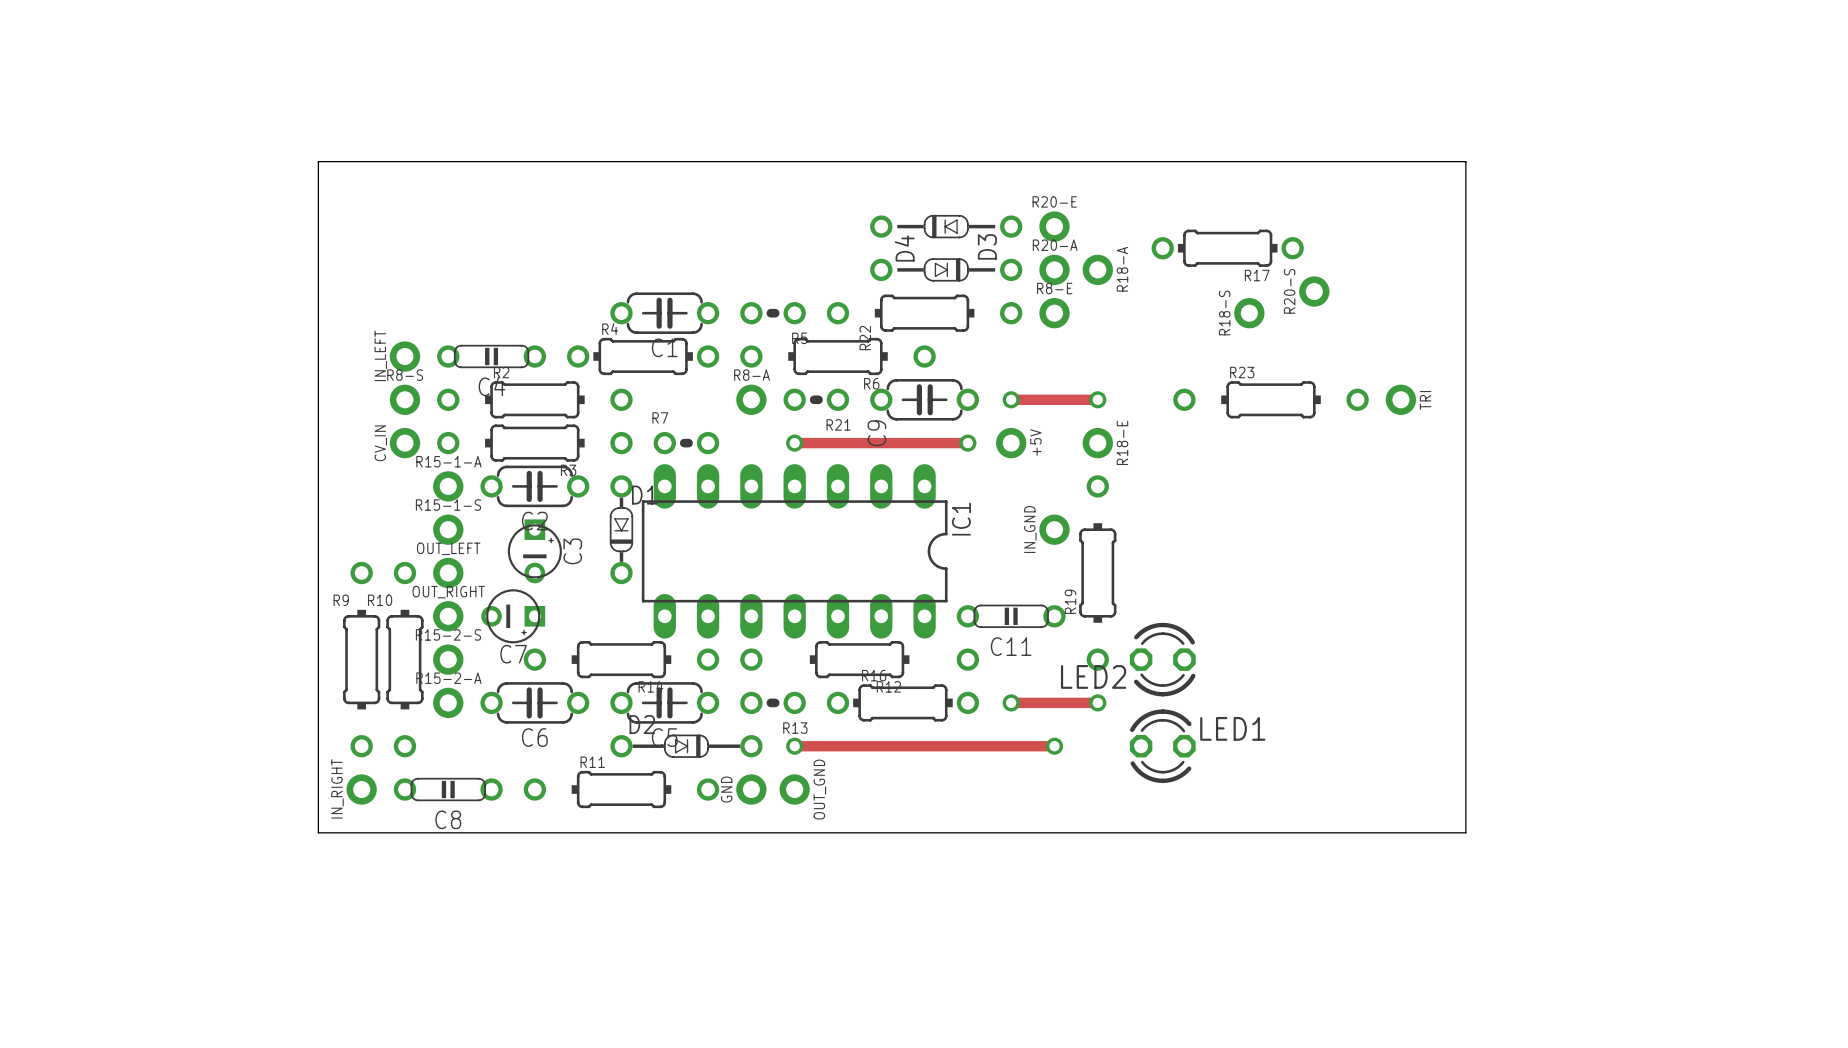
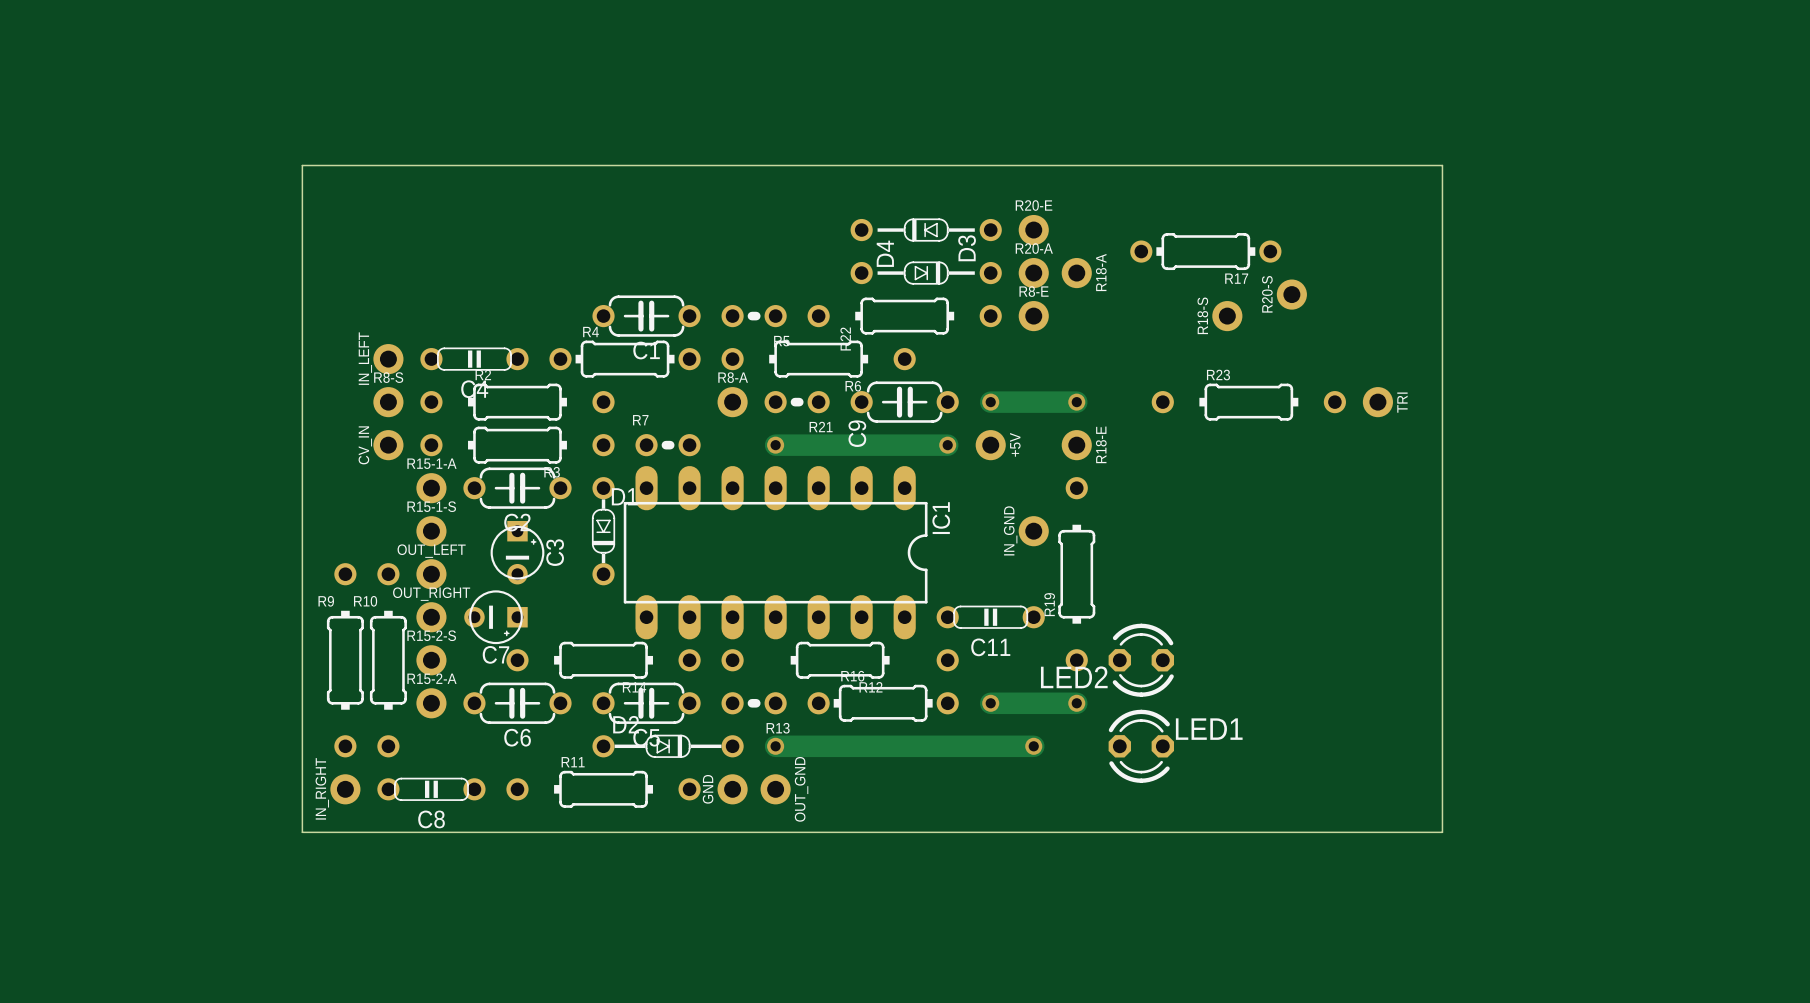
track width: thin (1011, 399) (1097, 399) -> thick (990, 402) (1076, 402)
track width: thin (794, 443) (967, 443) -> thick (775, 445) (947, 445)
track width: thin (1011, 702) (1097, 702) -> thick (990, 703) (1076, 703)
track width: thin (794, 746) (1054, 746) -> thick (775, 746) (1033, 746)

